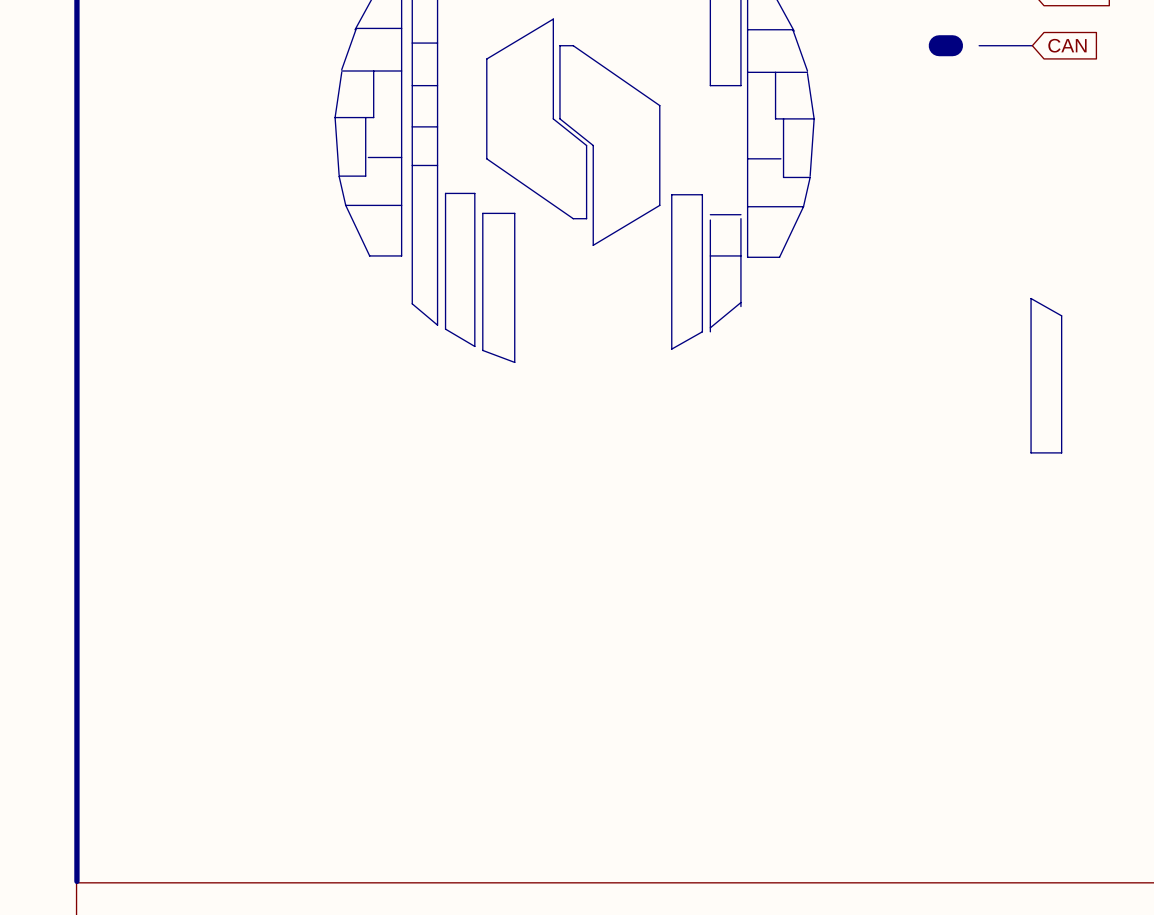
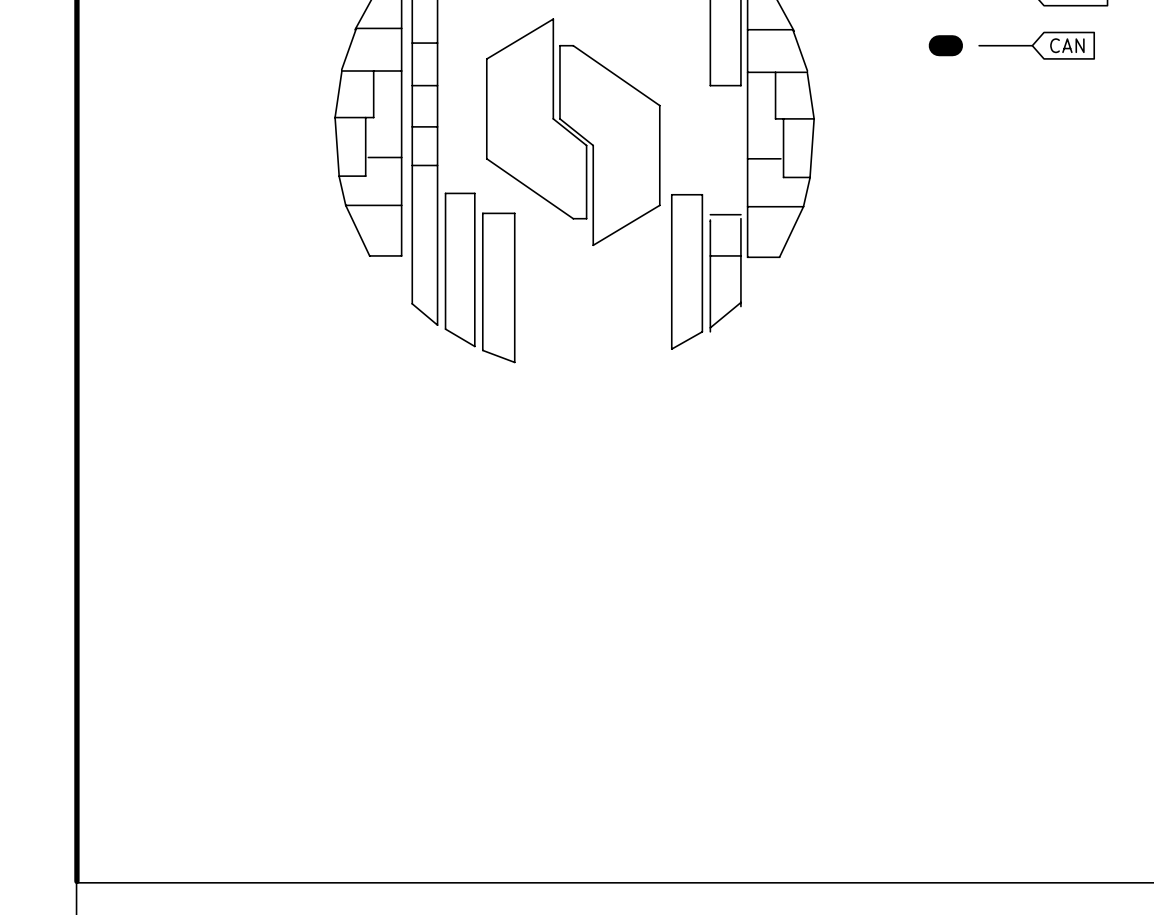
line: (1031, 298) (1061, 315) (1061, 452) (1031, 452) (1031, 298) -> none

